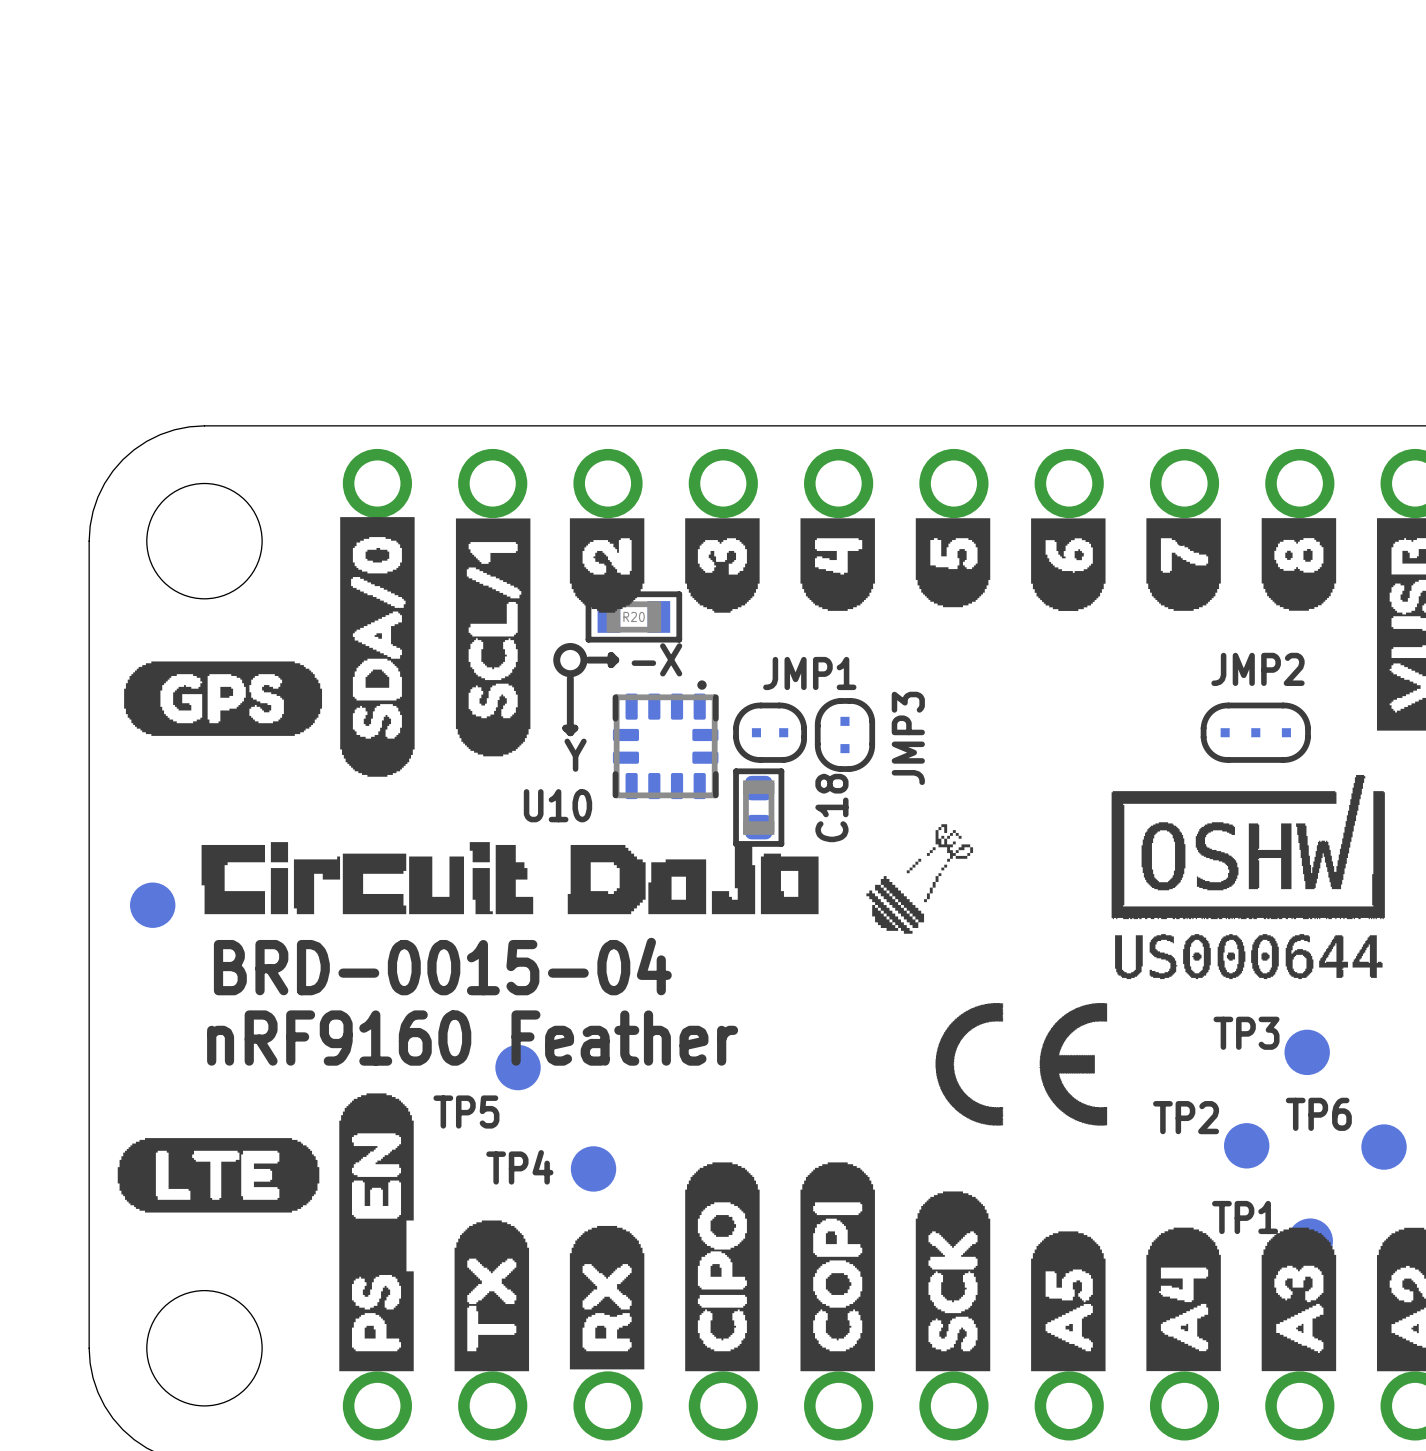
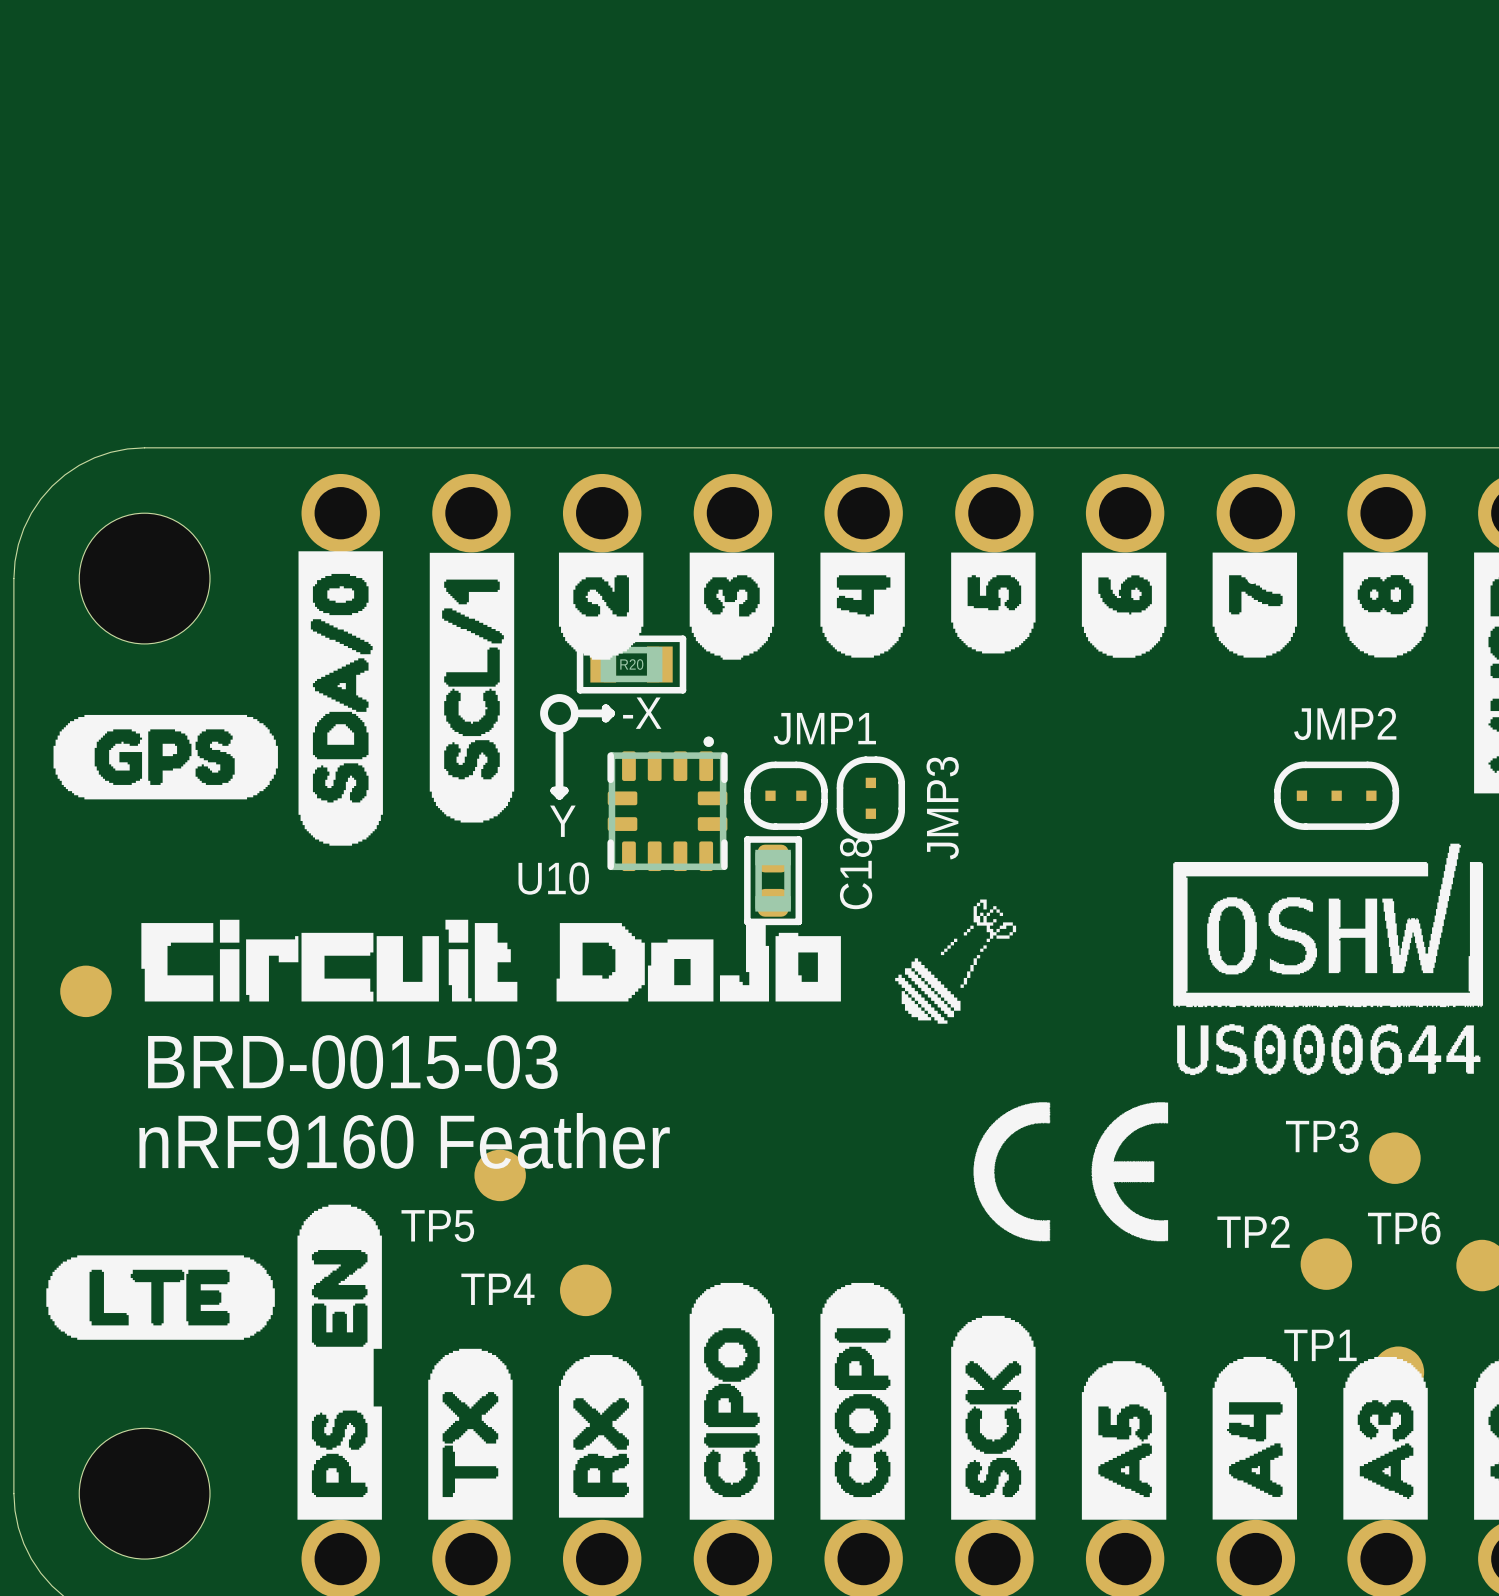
text: BRD-0015-04 (442, 966) -> BRD-0015-03 (352, 1062)

